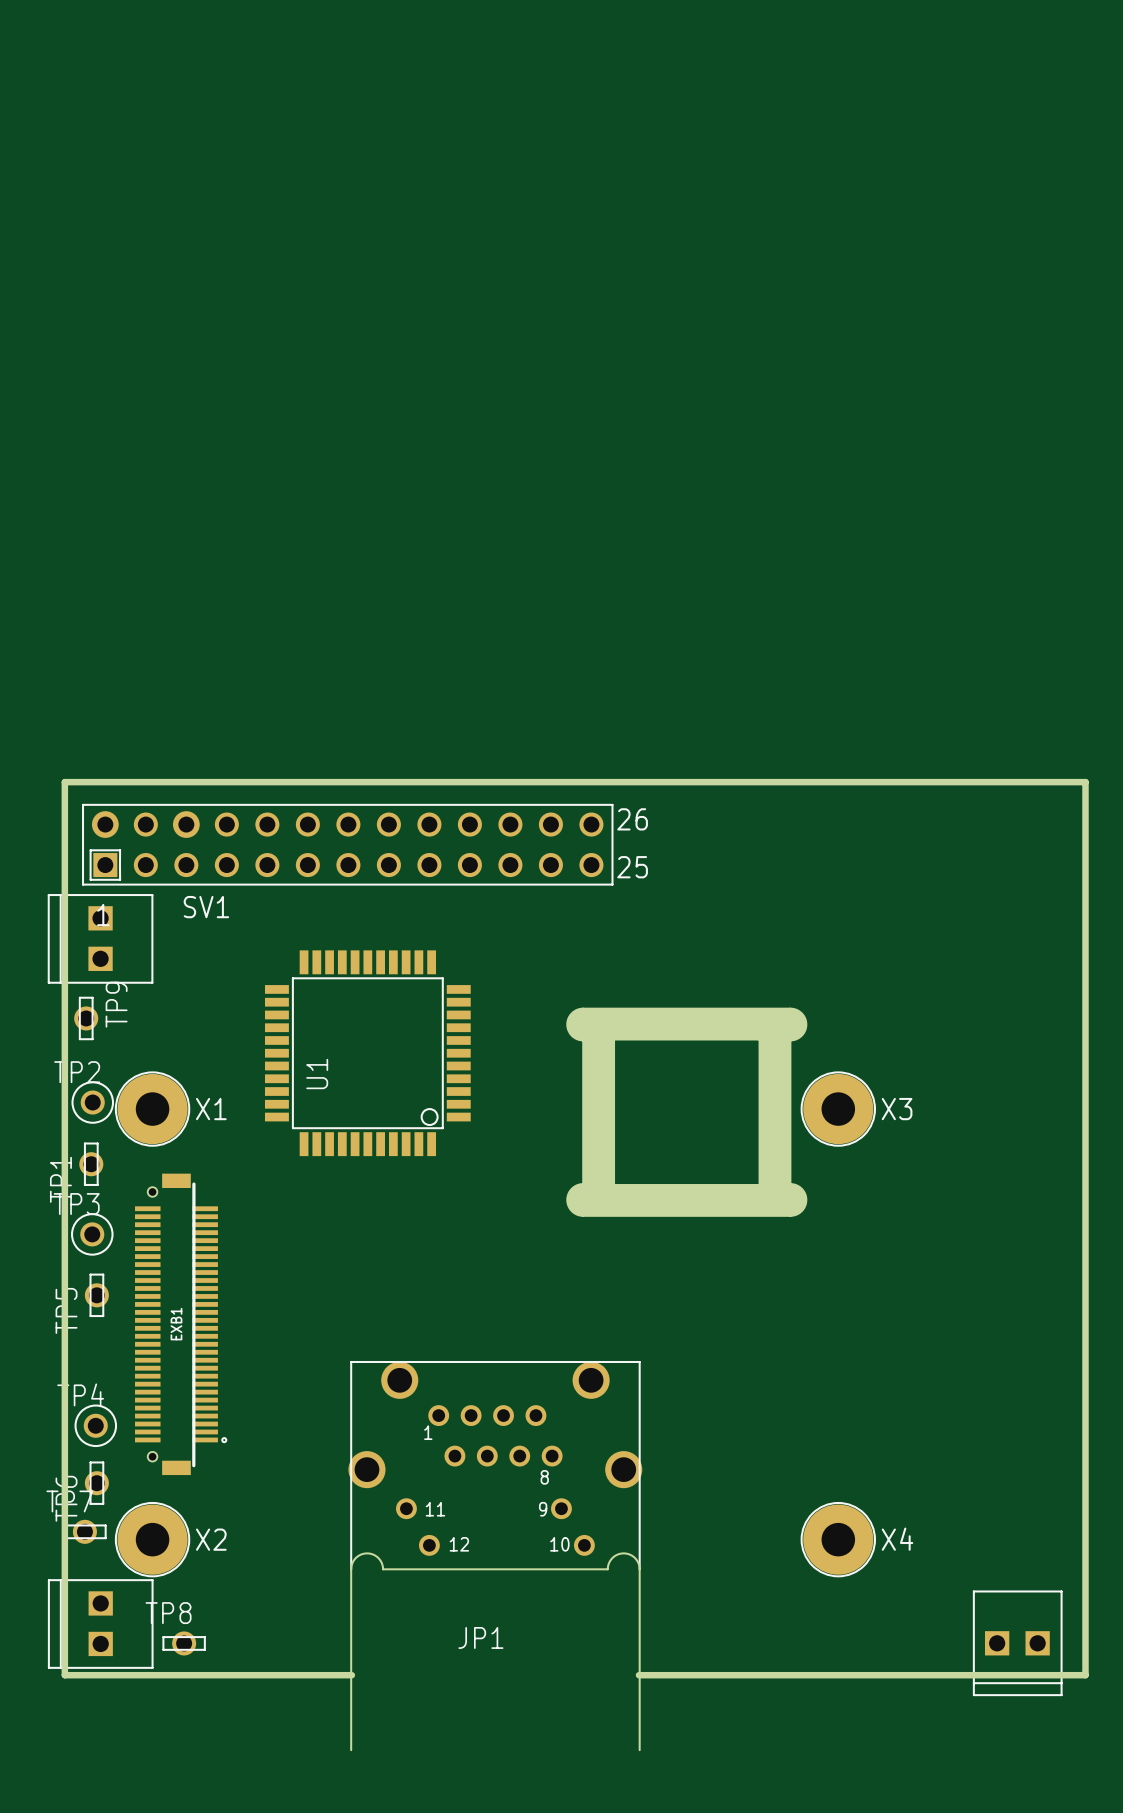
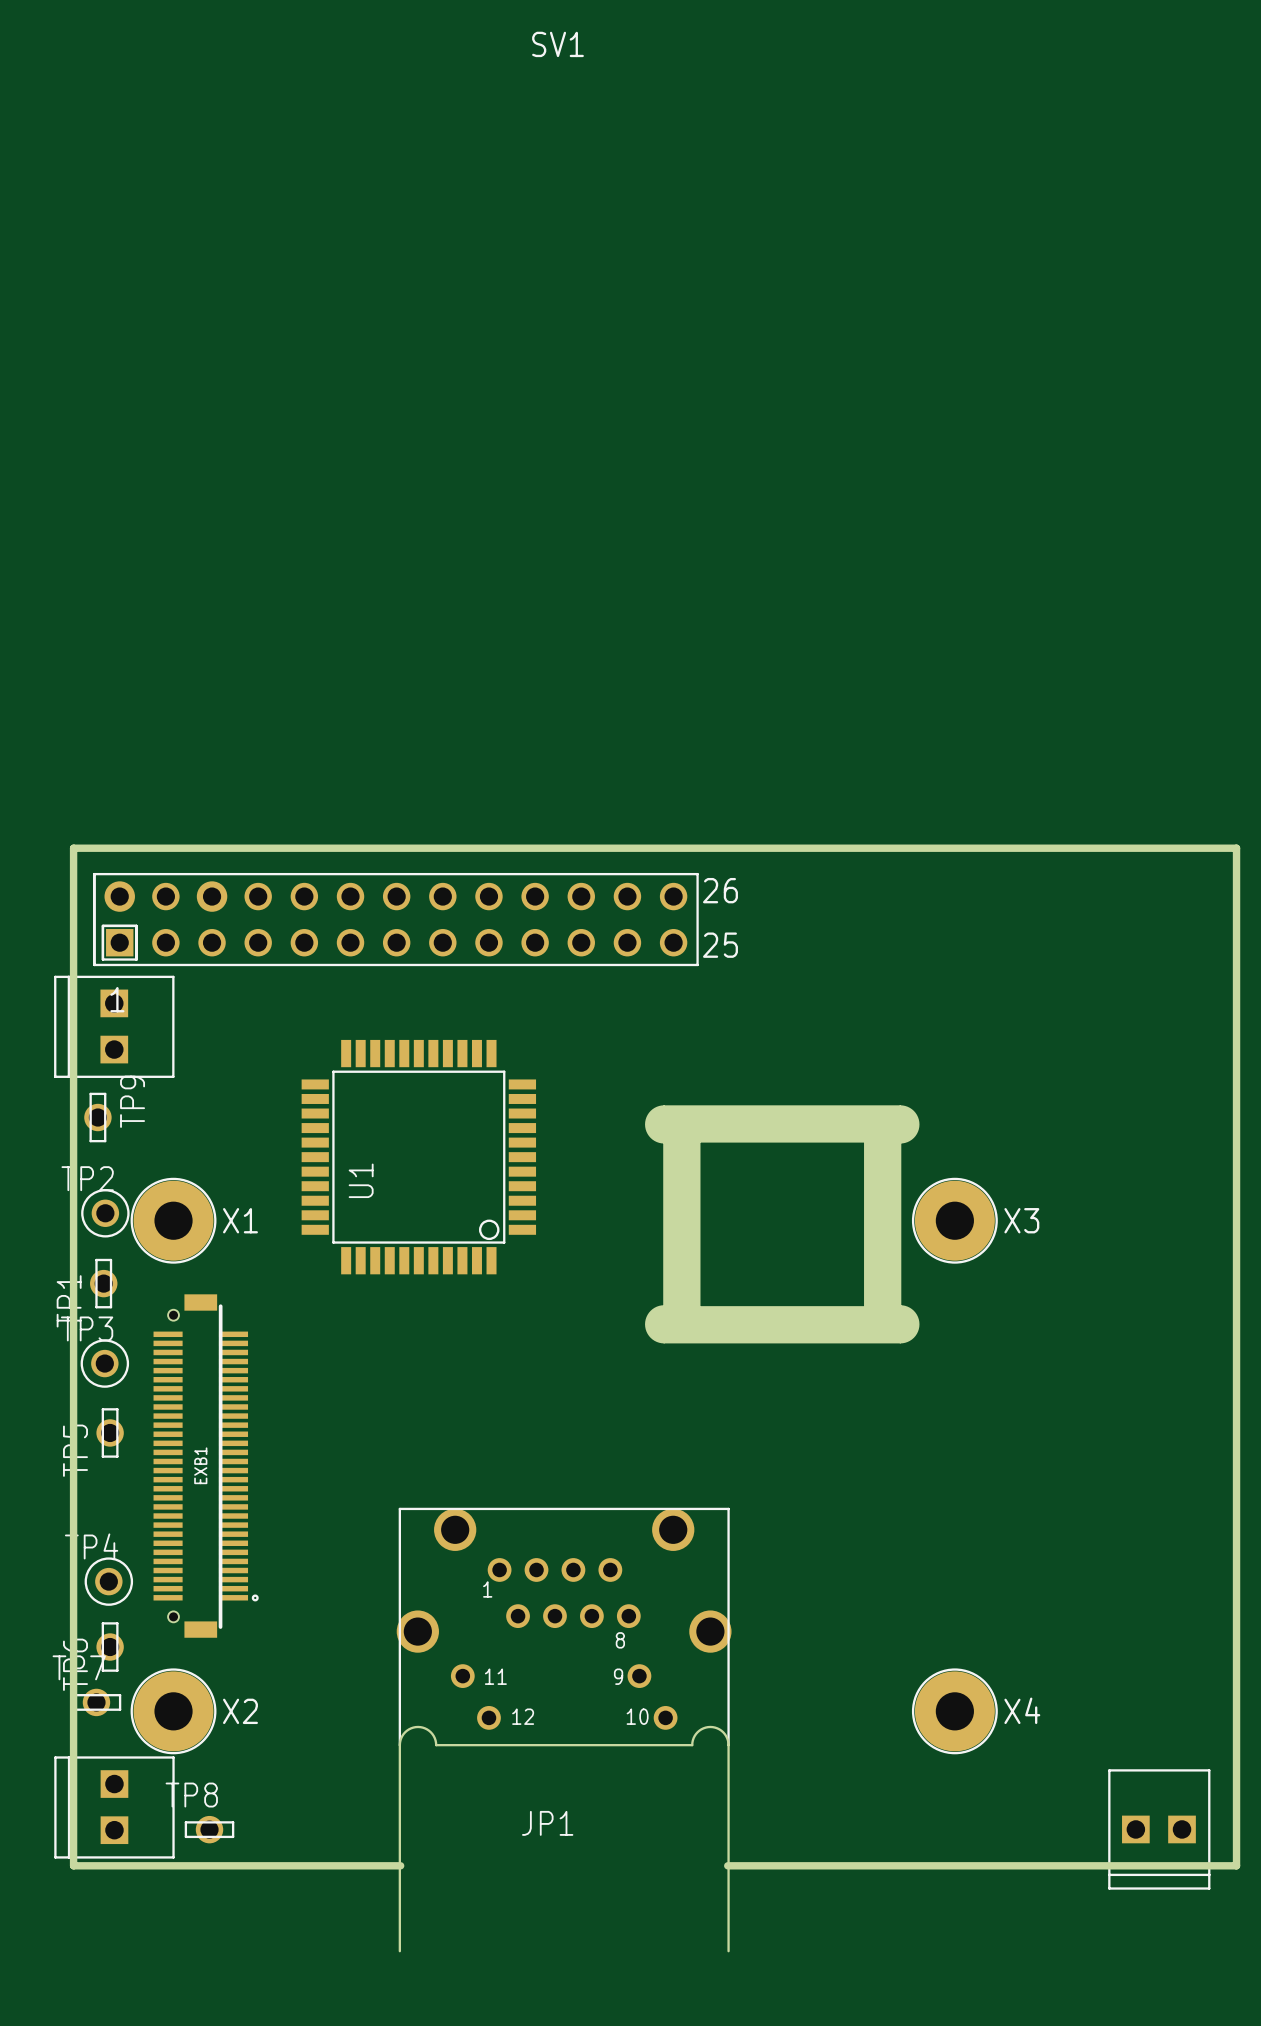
drawing: none -> [93, 872, 138, 967]
SV1 name position: SV1 (206, 907) -> SV1 (557, 44)

